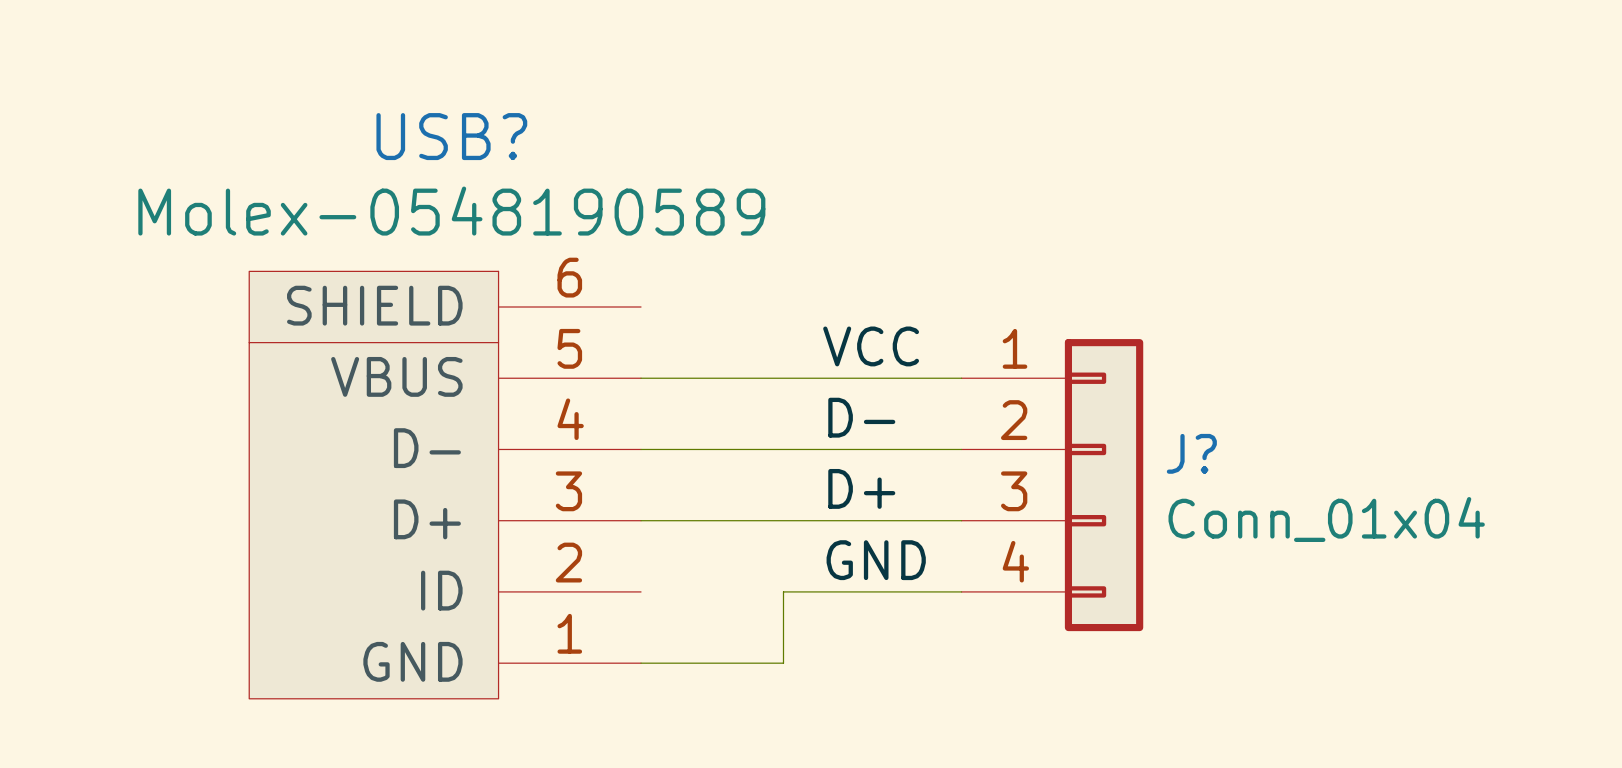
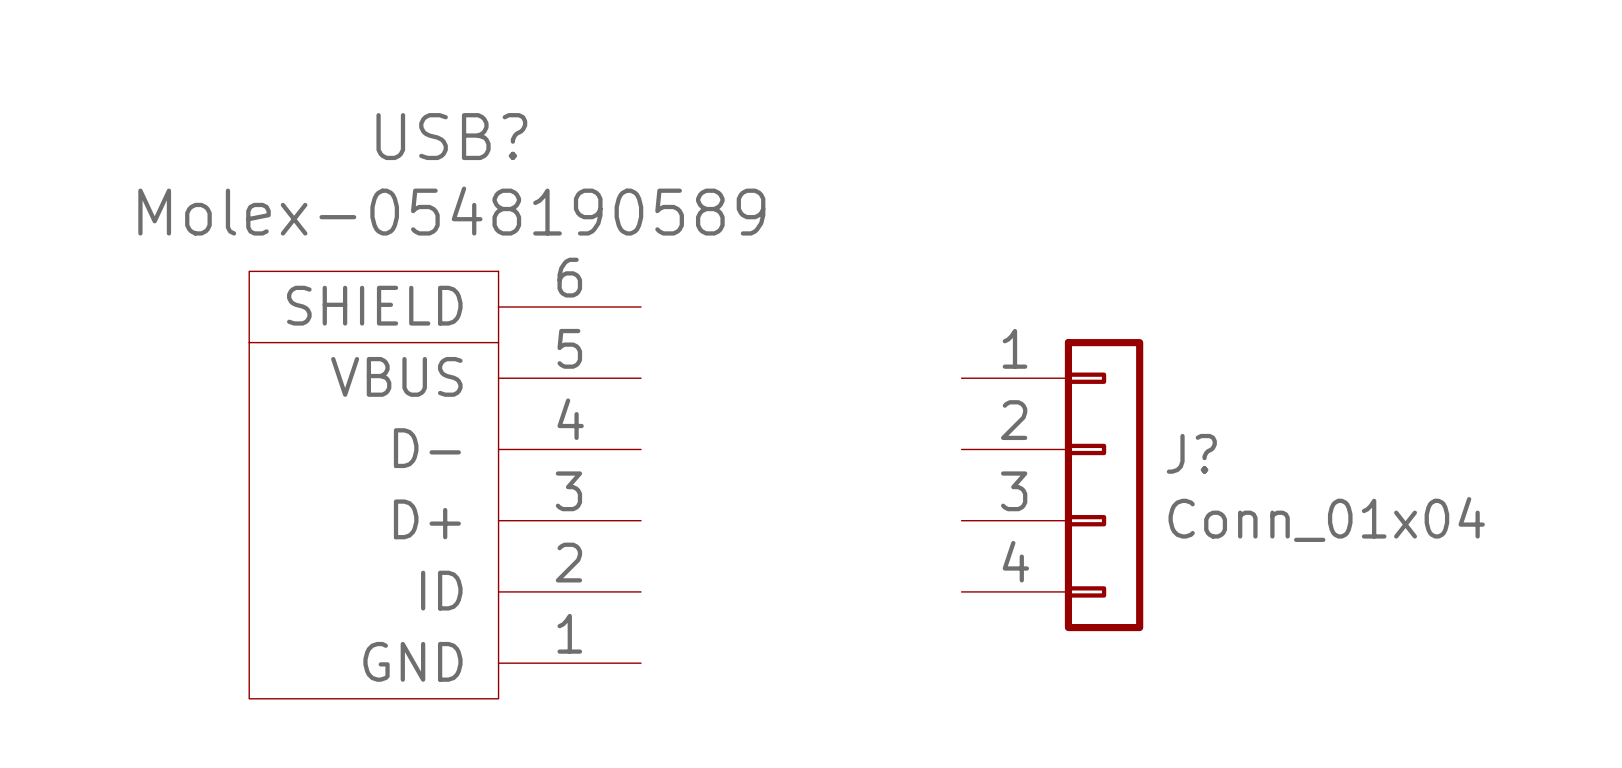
label: VCC (871, 346) -> none
wire: (641, 378) (961, 378) -> none
label: D- (861, 417) -> none
wire: (641, 449) (961, 449) -> none
label: D+ (861, 488) -> none
wire: (641, 520) (961, 520) -> none
label: GND (876, 560) -> none
wire: (961, 591) (783, 591) (783, 663) (641, 663) -> none

